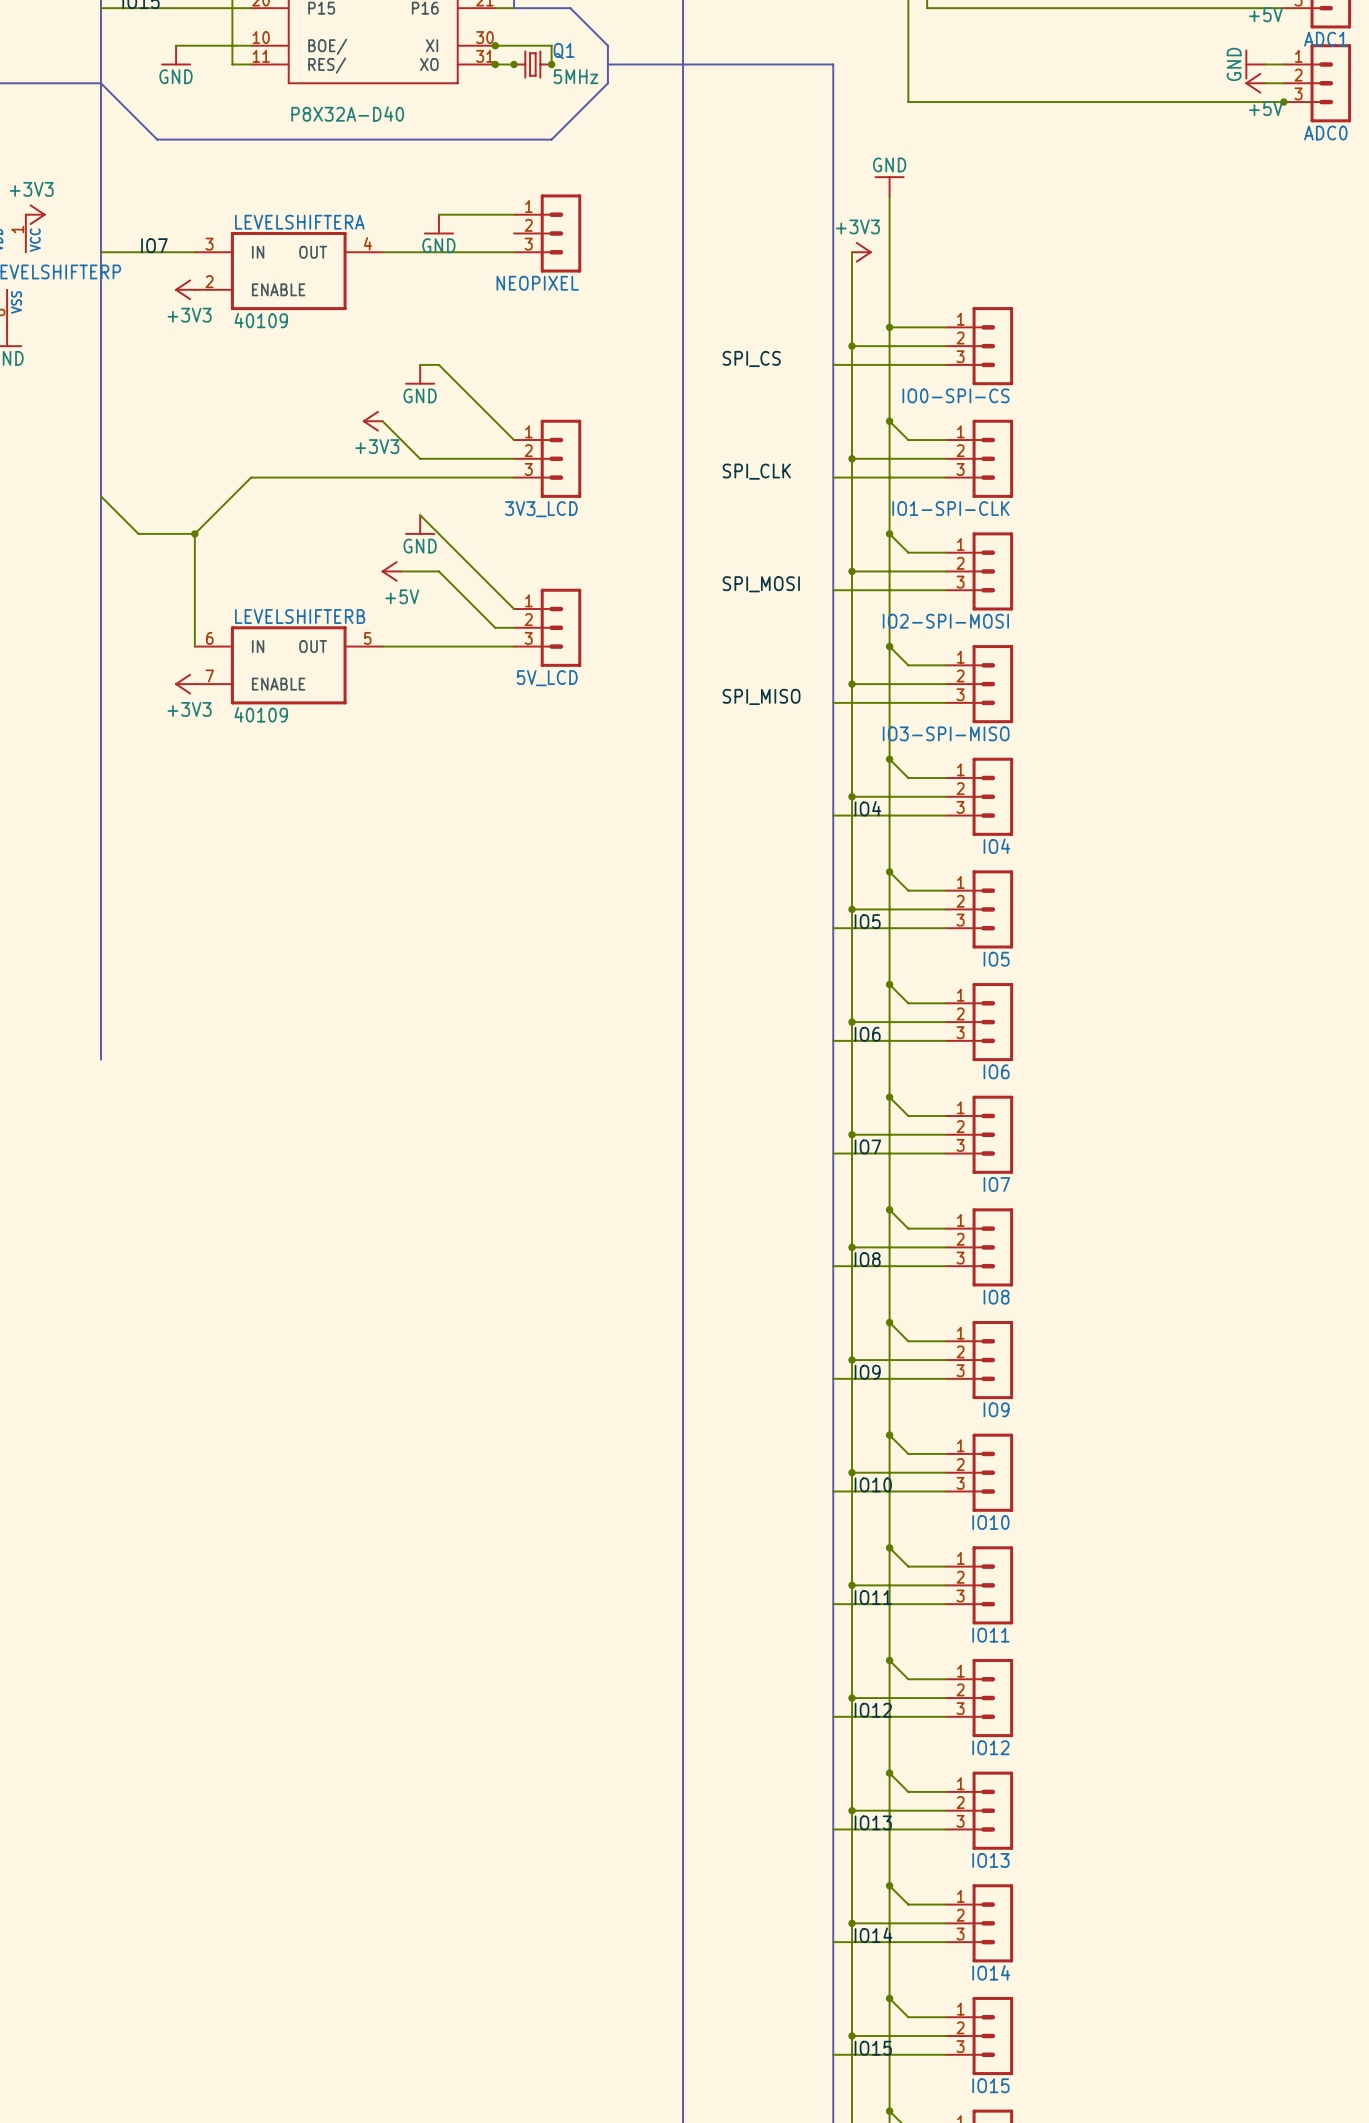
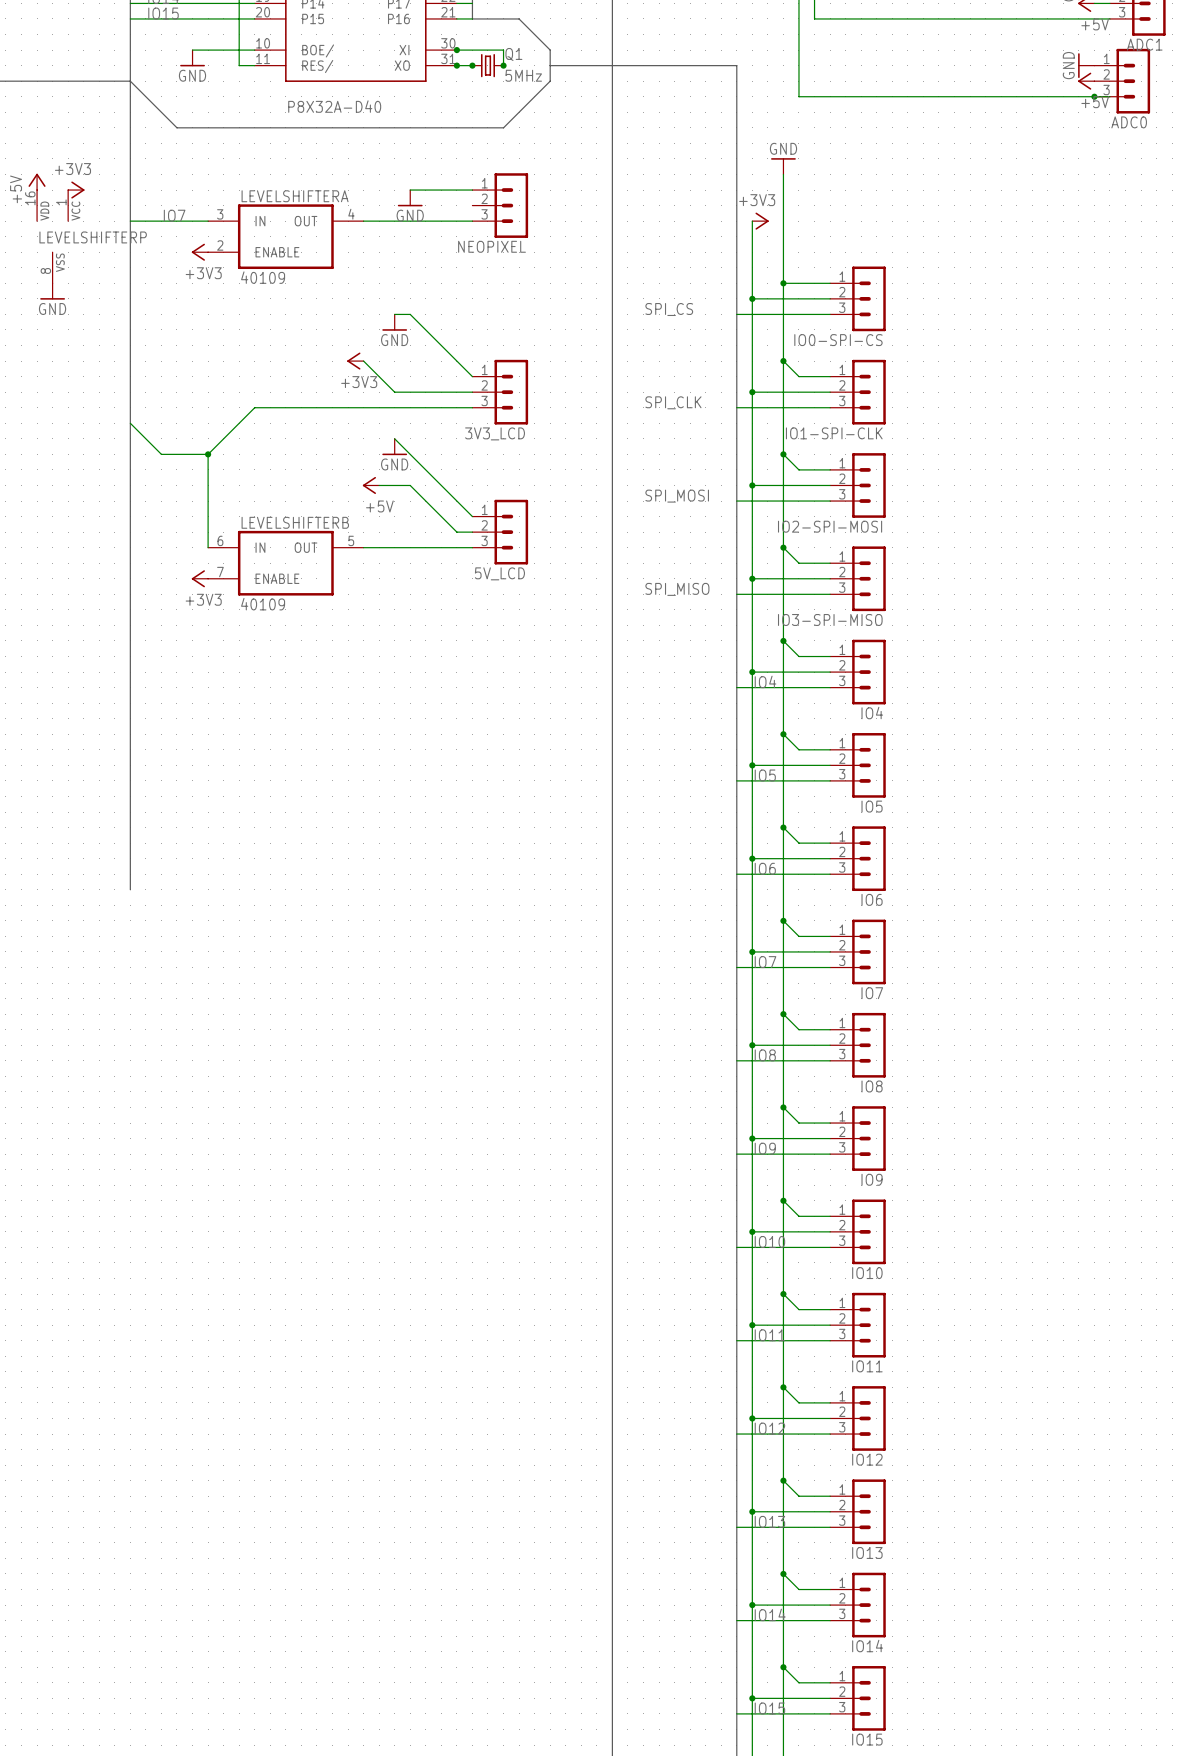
ADC0 position: (1317, 83) -> (1122, 81)
junction position: (1283, 102) -> (1094, 96)

